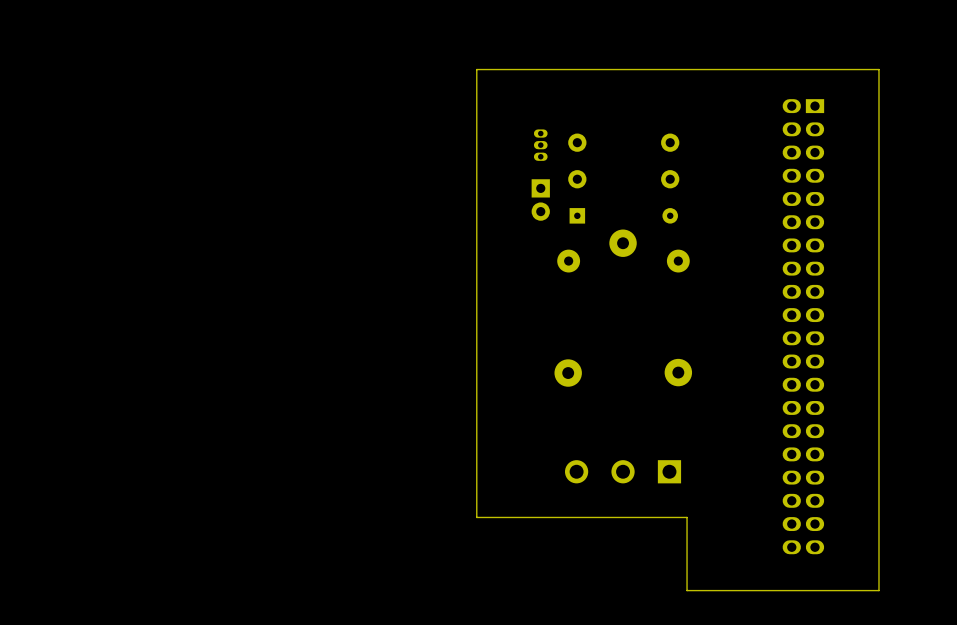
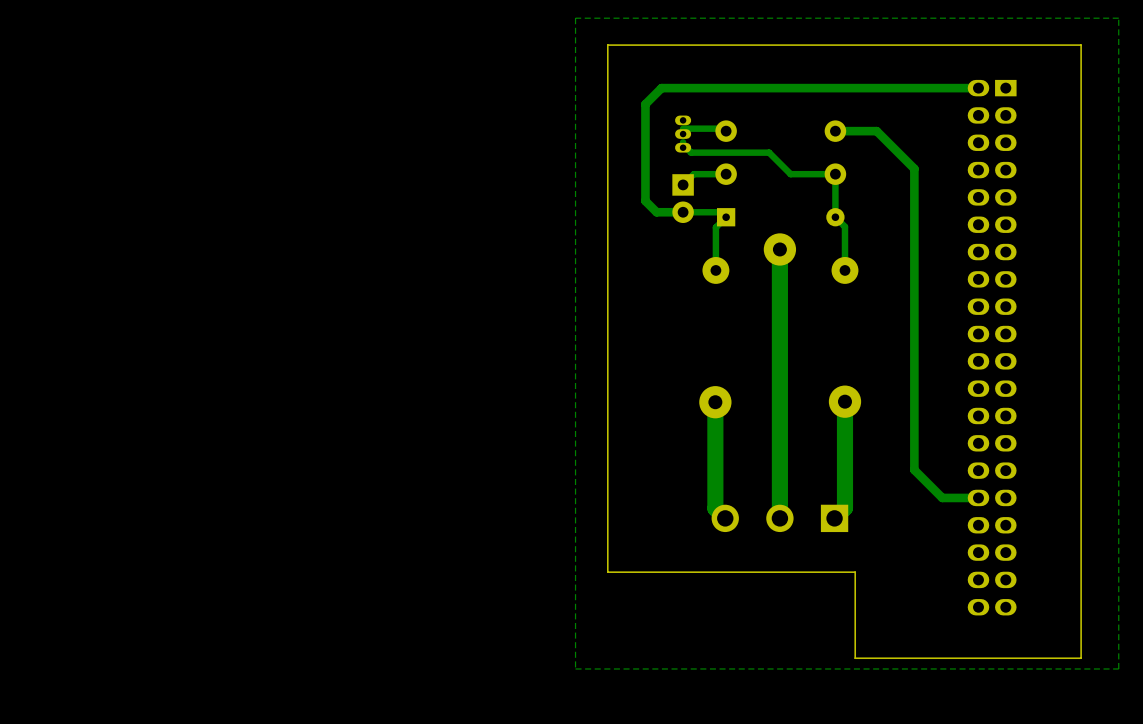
zone outline: none -> (1118, 18) (575, 18) (575, 668) (1118, 668) (1118, 18)
track: none -> (978, 88) (661, 88) (645, 104) (645, 201) (656, 212) (721, 212) (726, 217) (715, 227) (715, 270)
track: none -> (683, 128) (723, 128) (726, 131)
track: none -> (835, 131) (876, 131) (914, 168) (914, 469) (942, 497) (978, 497)
track: none -> (683, 142) (691, 152) (769, 152) (790, 174) (835, 174) (835, 217) (844, 226) (844, 270)
track: none -> (726, 174) (693, 174) (683, 184)
track: none -> (779, 249) (779, 518)
track: none -> (844, 401) (844, 507) (834, 518)
track: none -> (715, 402) (715, 508) (725, 518)

